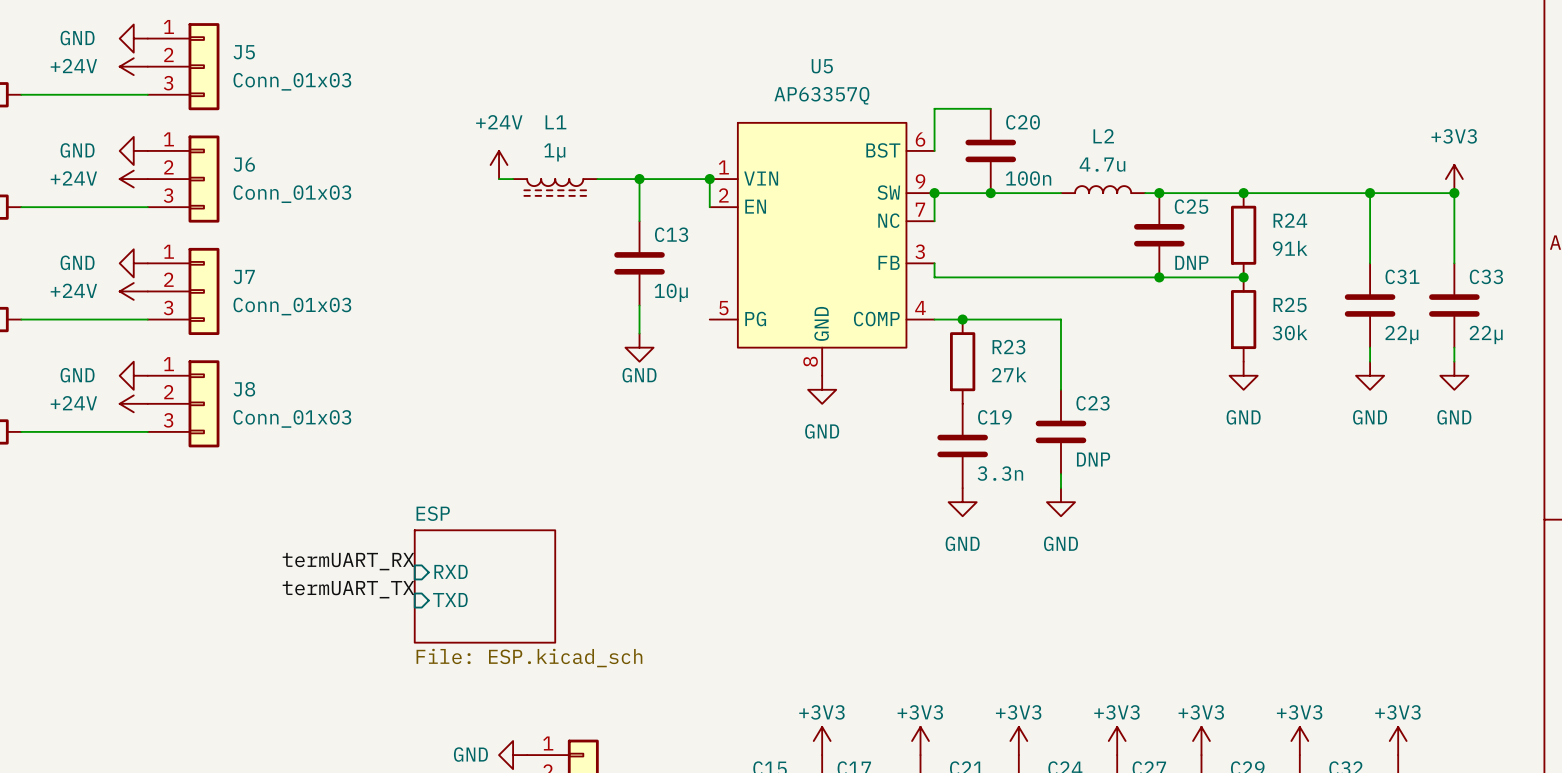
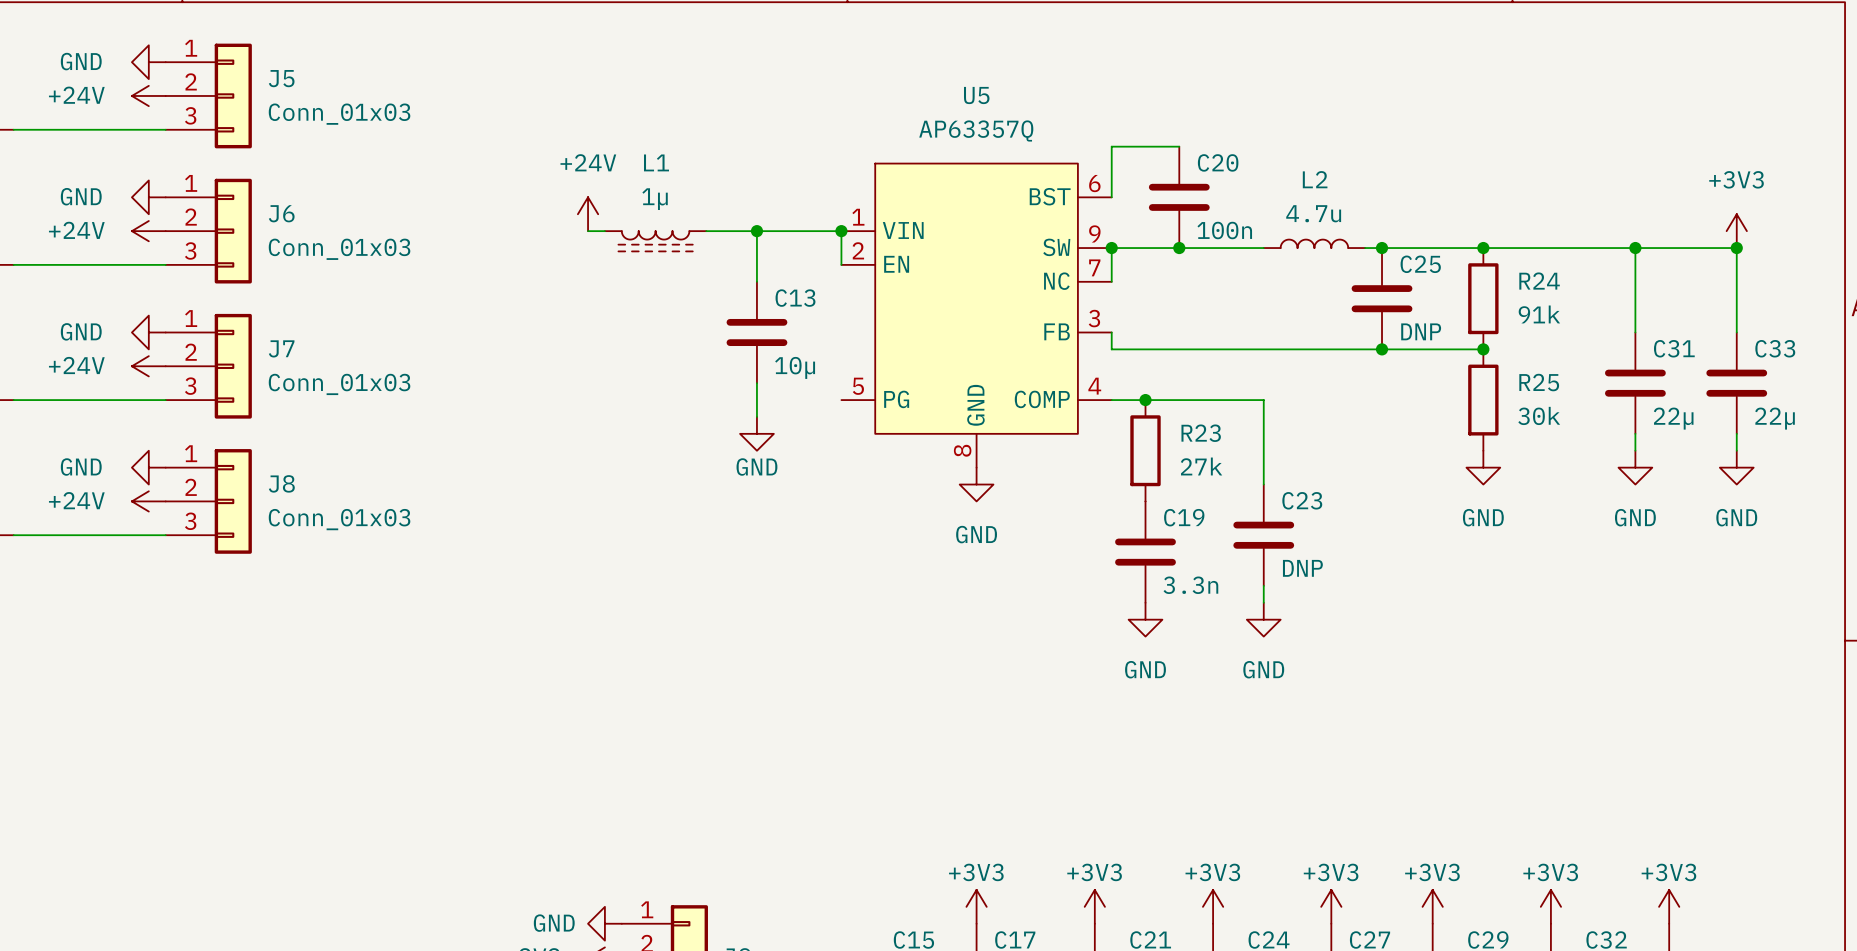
label: termUART_RX (348, 561) -> none
sheet pin: RXD (451, 571) -> none
sheet ESP: File: ESP.kicad_sch (484, 586) -> none
label: termUART_TX (348, 589) -> none
sheet pin: TXD (450, 600) -> none

